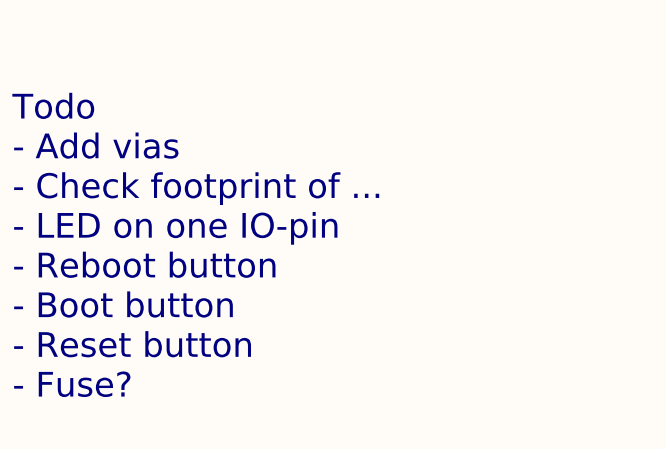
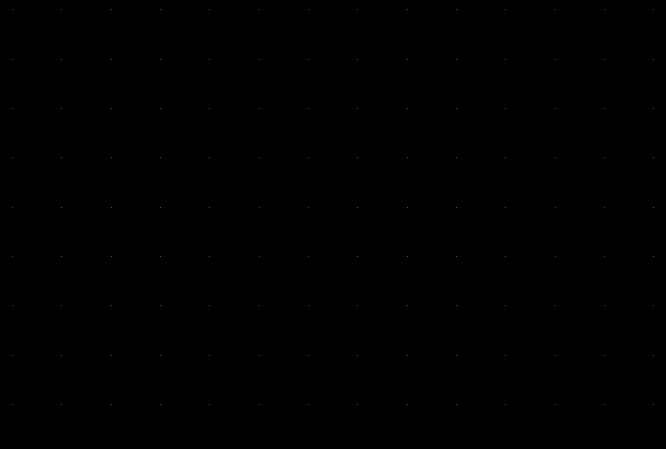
text: Todo (53, 105) -> none
text: - Add vias (96, 145) -> none
text: - Check footprint of ... (196, 188) -> none
text: - LED on one IO-pin (175, 228) -> none
text: - Reboot button (144, 264) -> none
text: - Boot button (123, 304) -> none
text: - Reset button (132, 344) -> none
text: - Fuse? (72, 384) -> none

